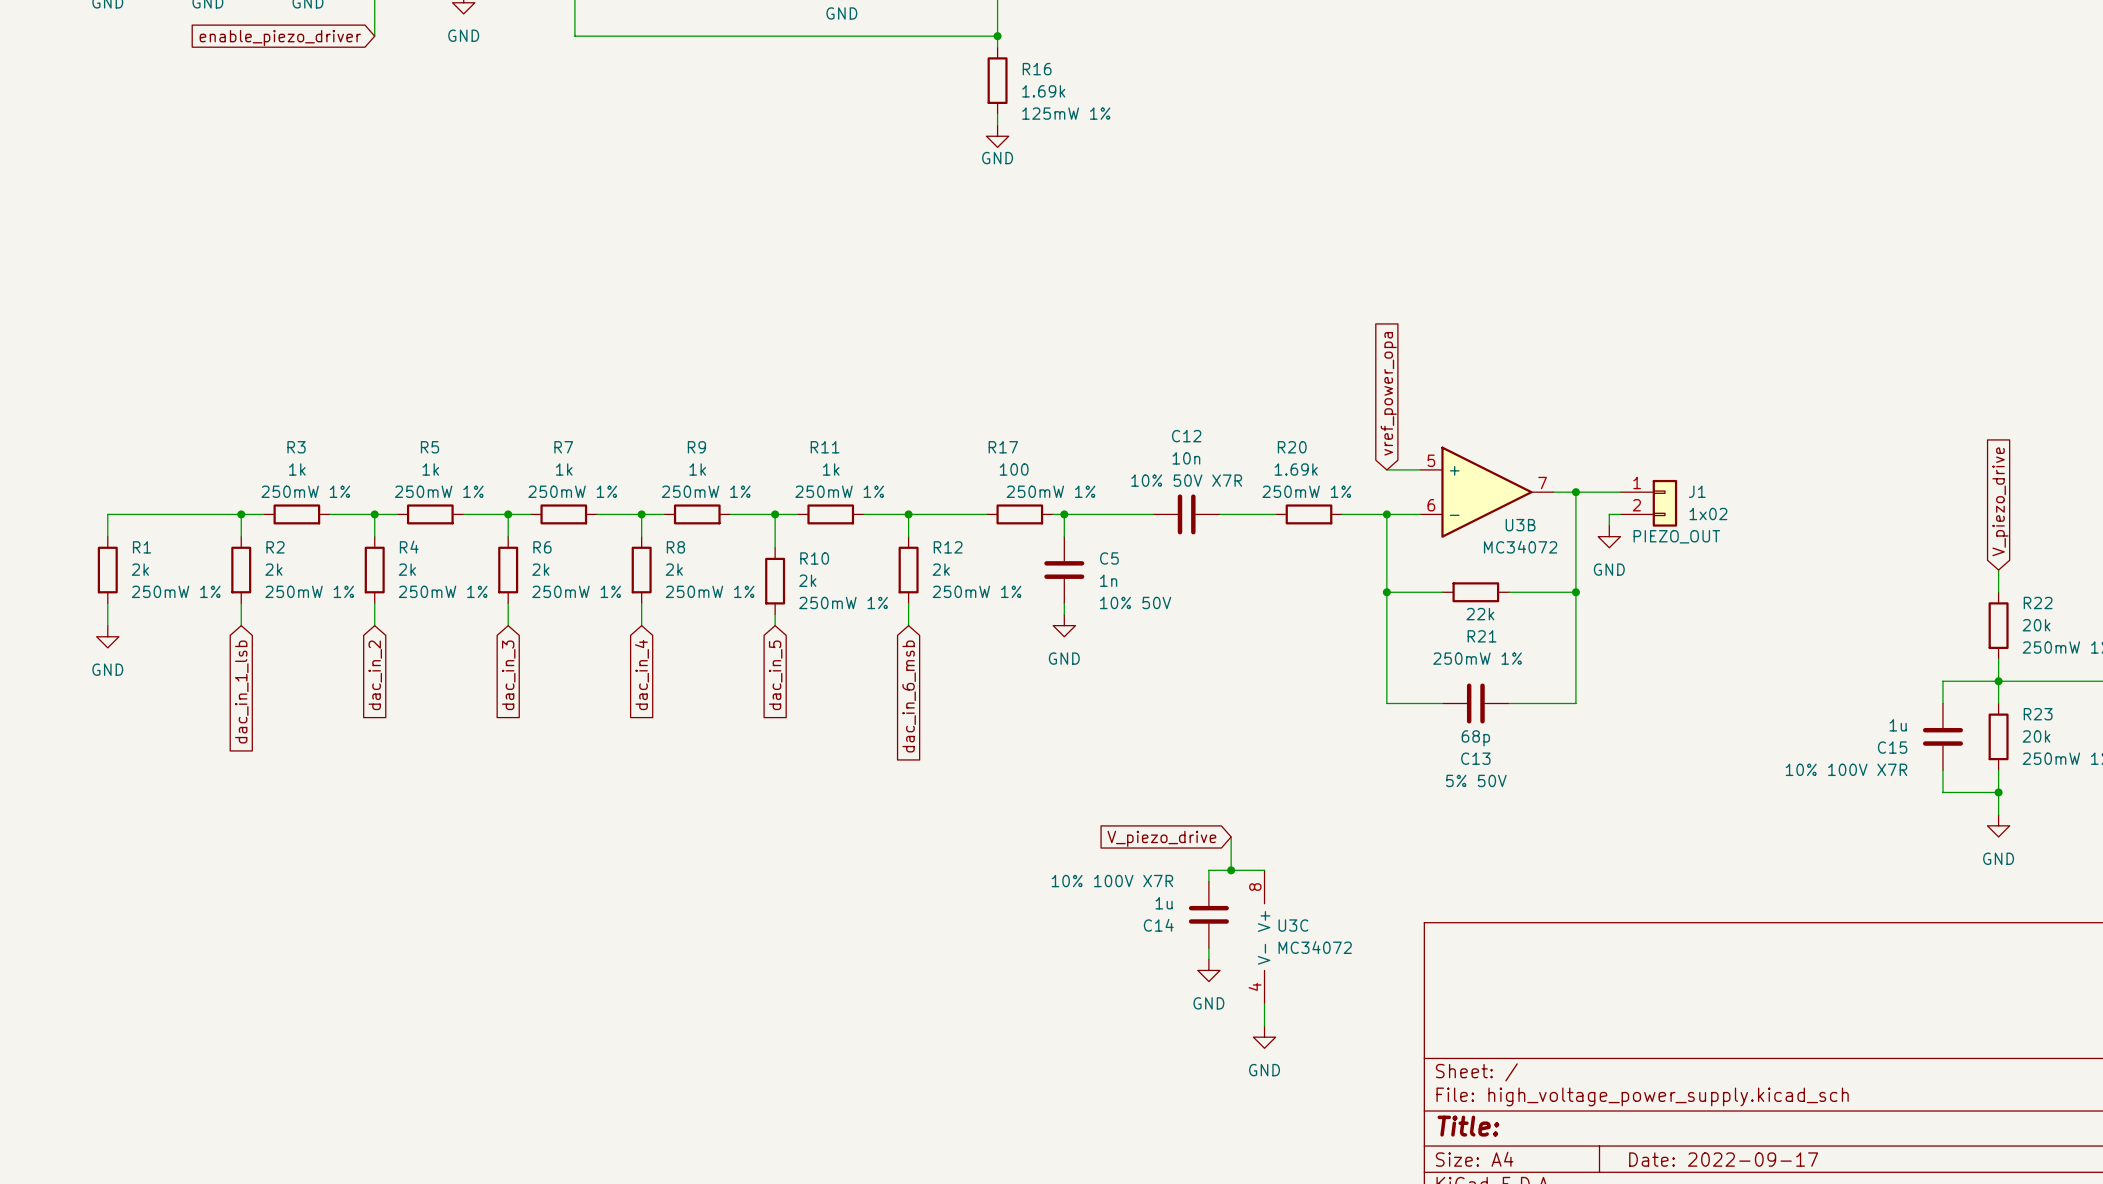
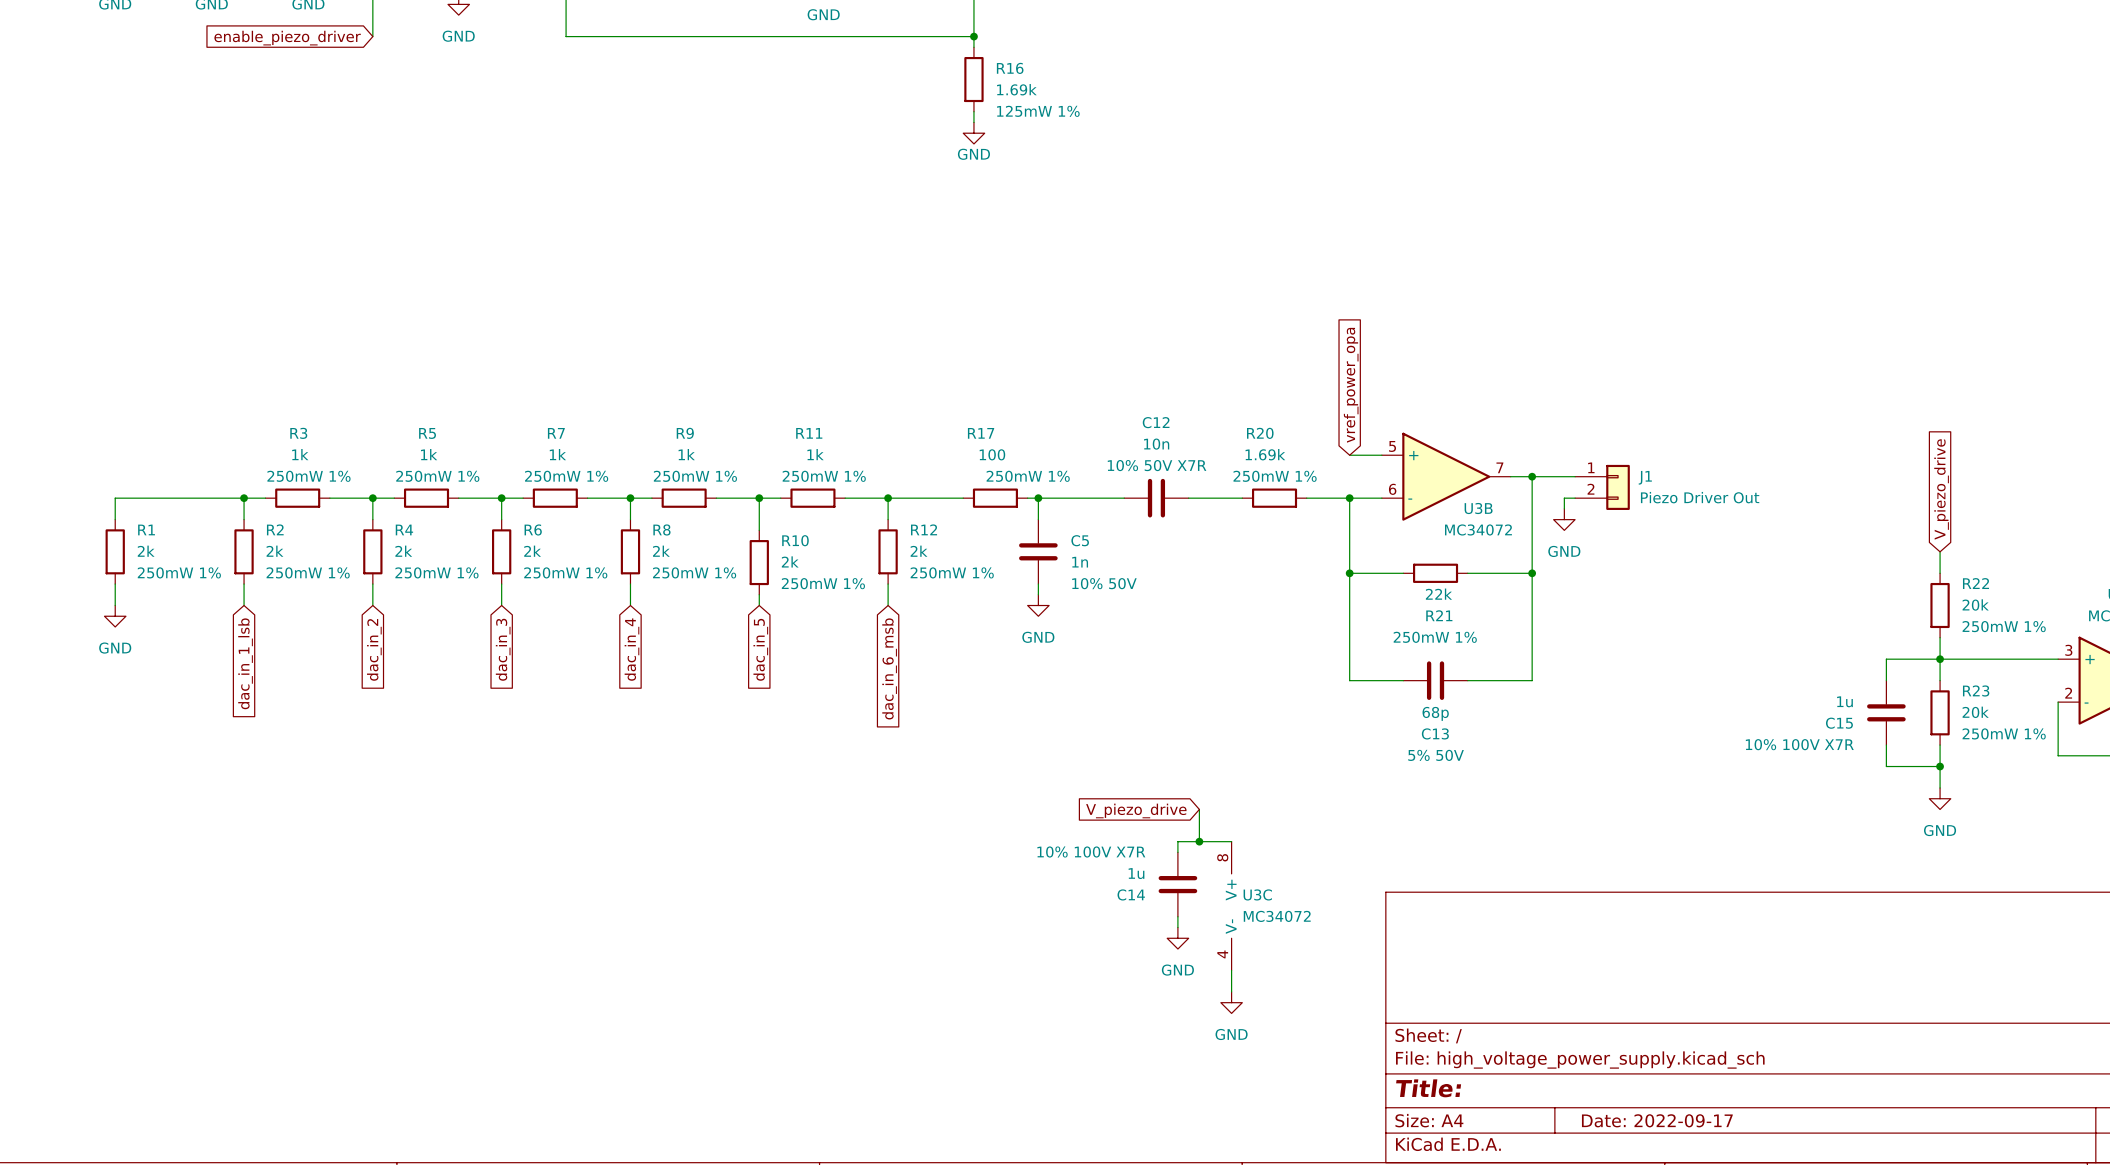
J1 value: 1x02 (1708, 514) -> Piezo Driver Out (1700, 497)
J1 text: PIEZO_OUT (1676, 536) -> none

